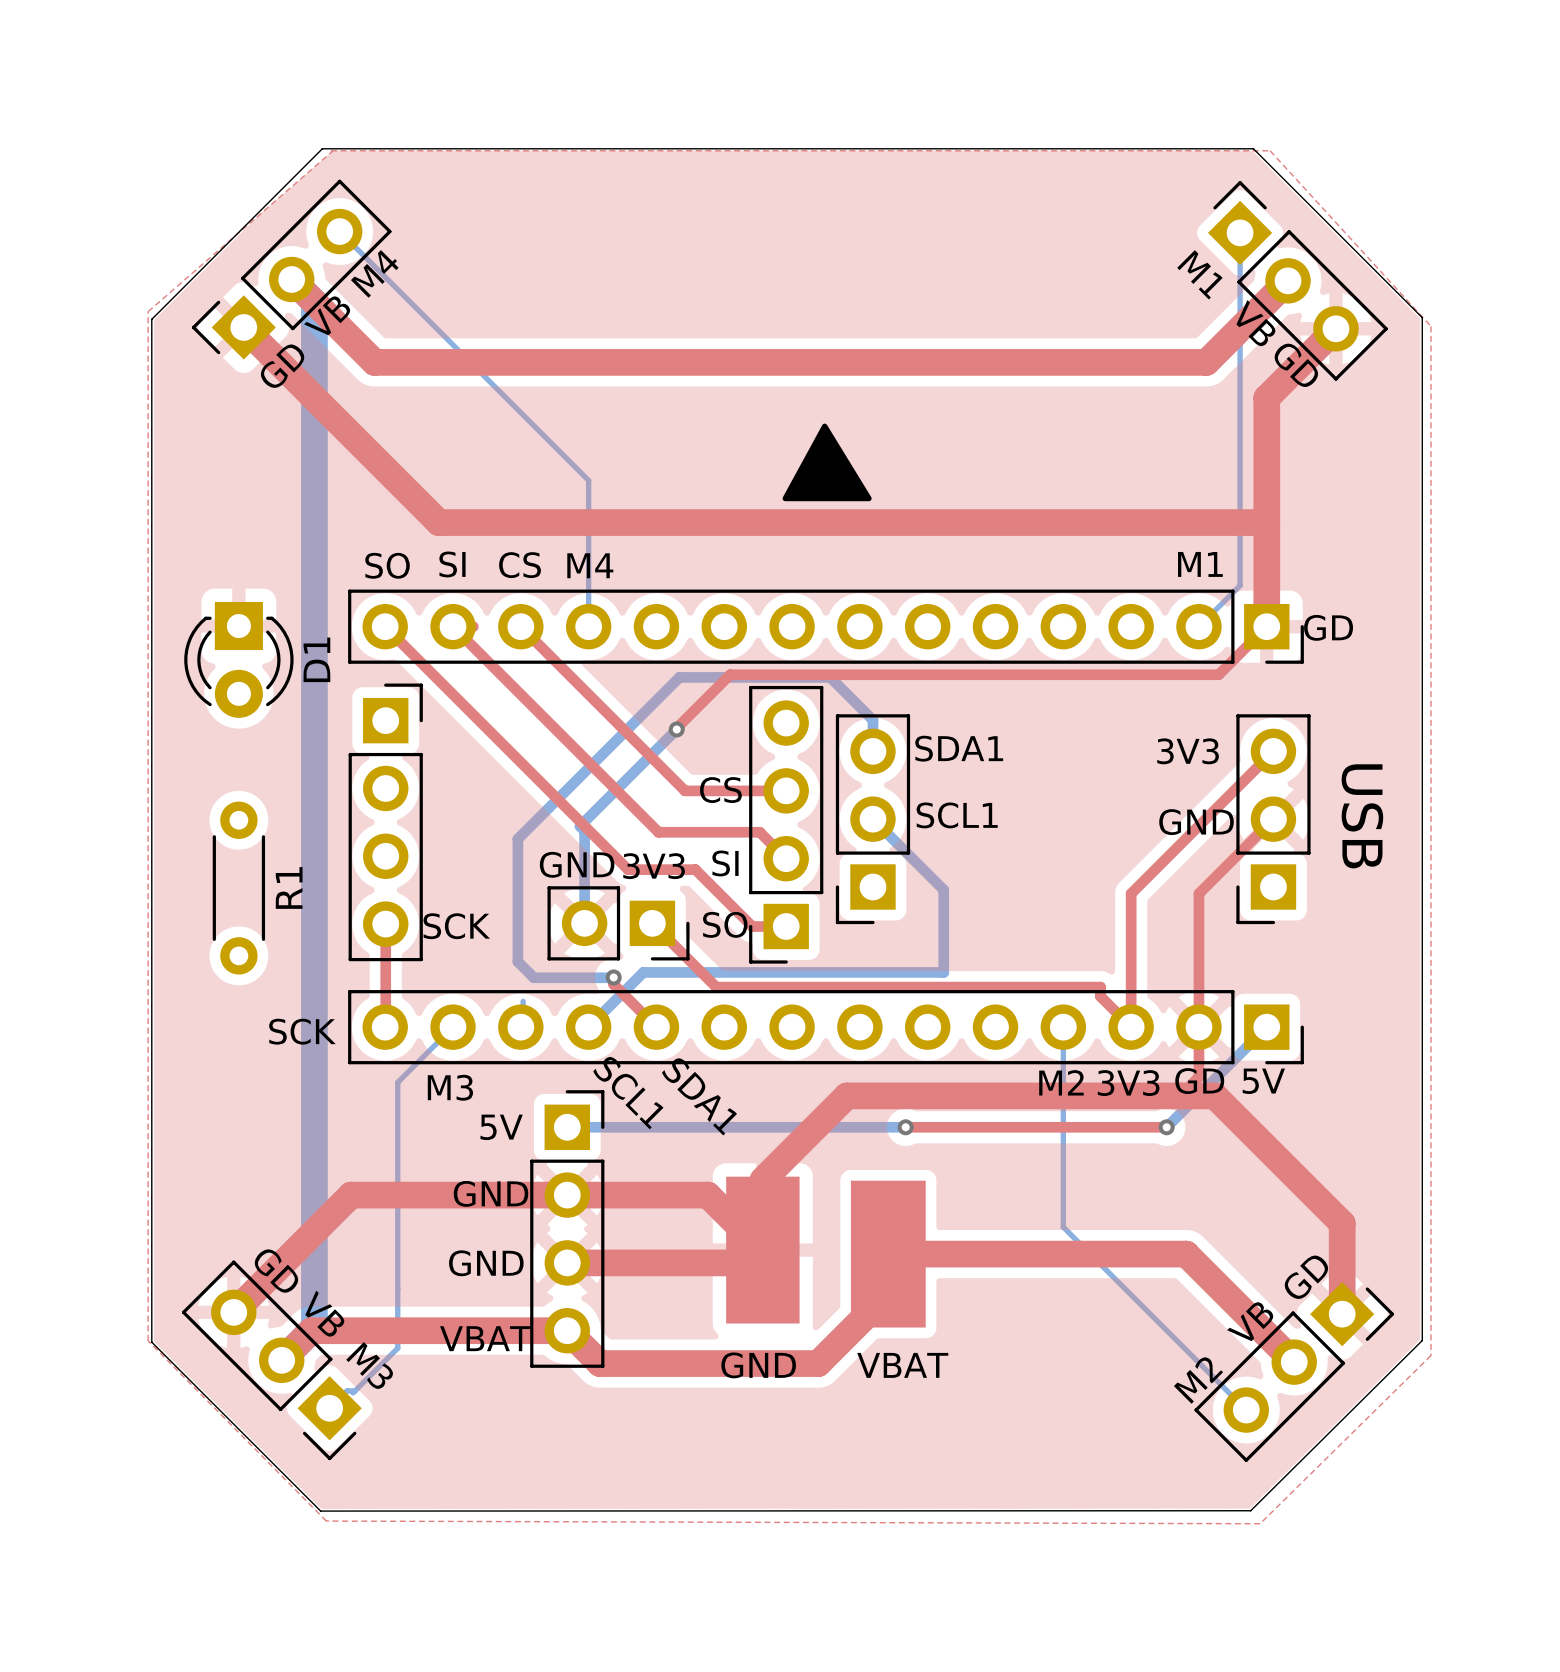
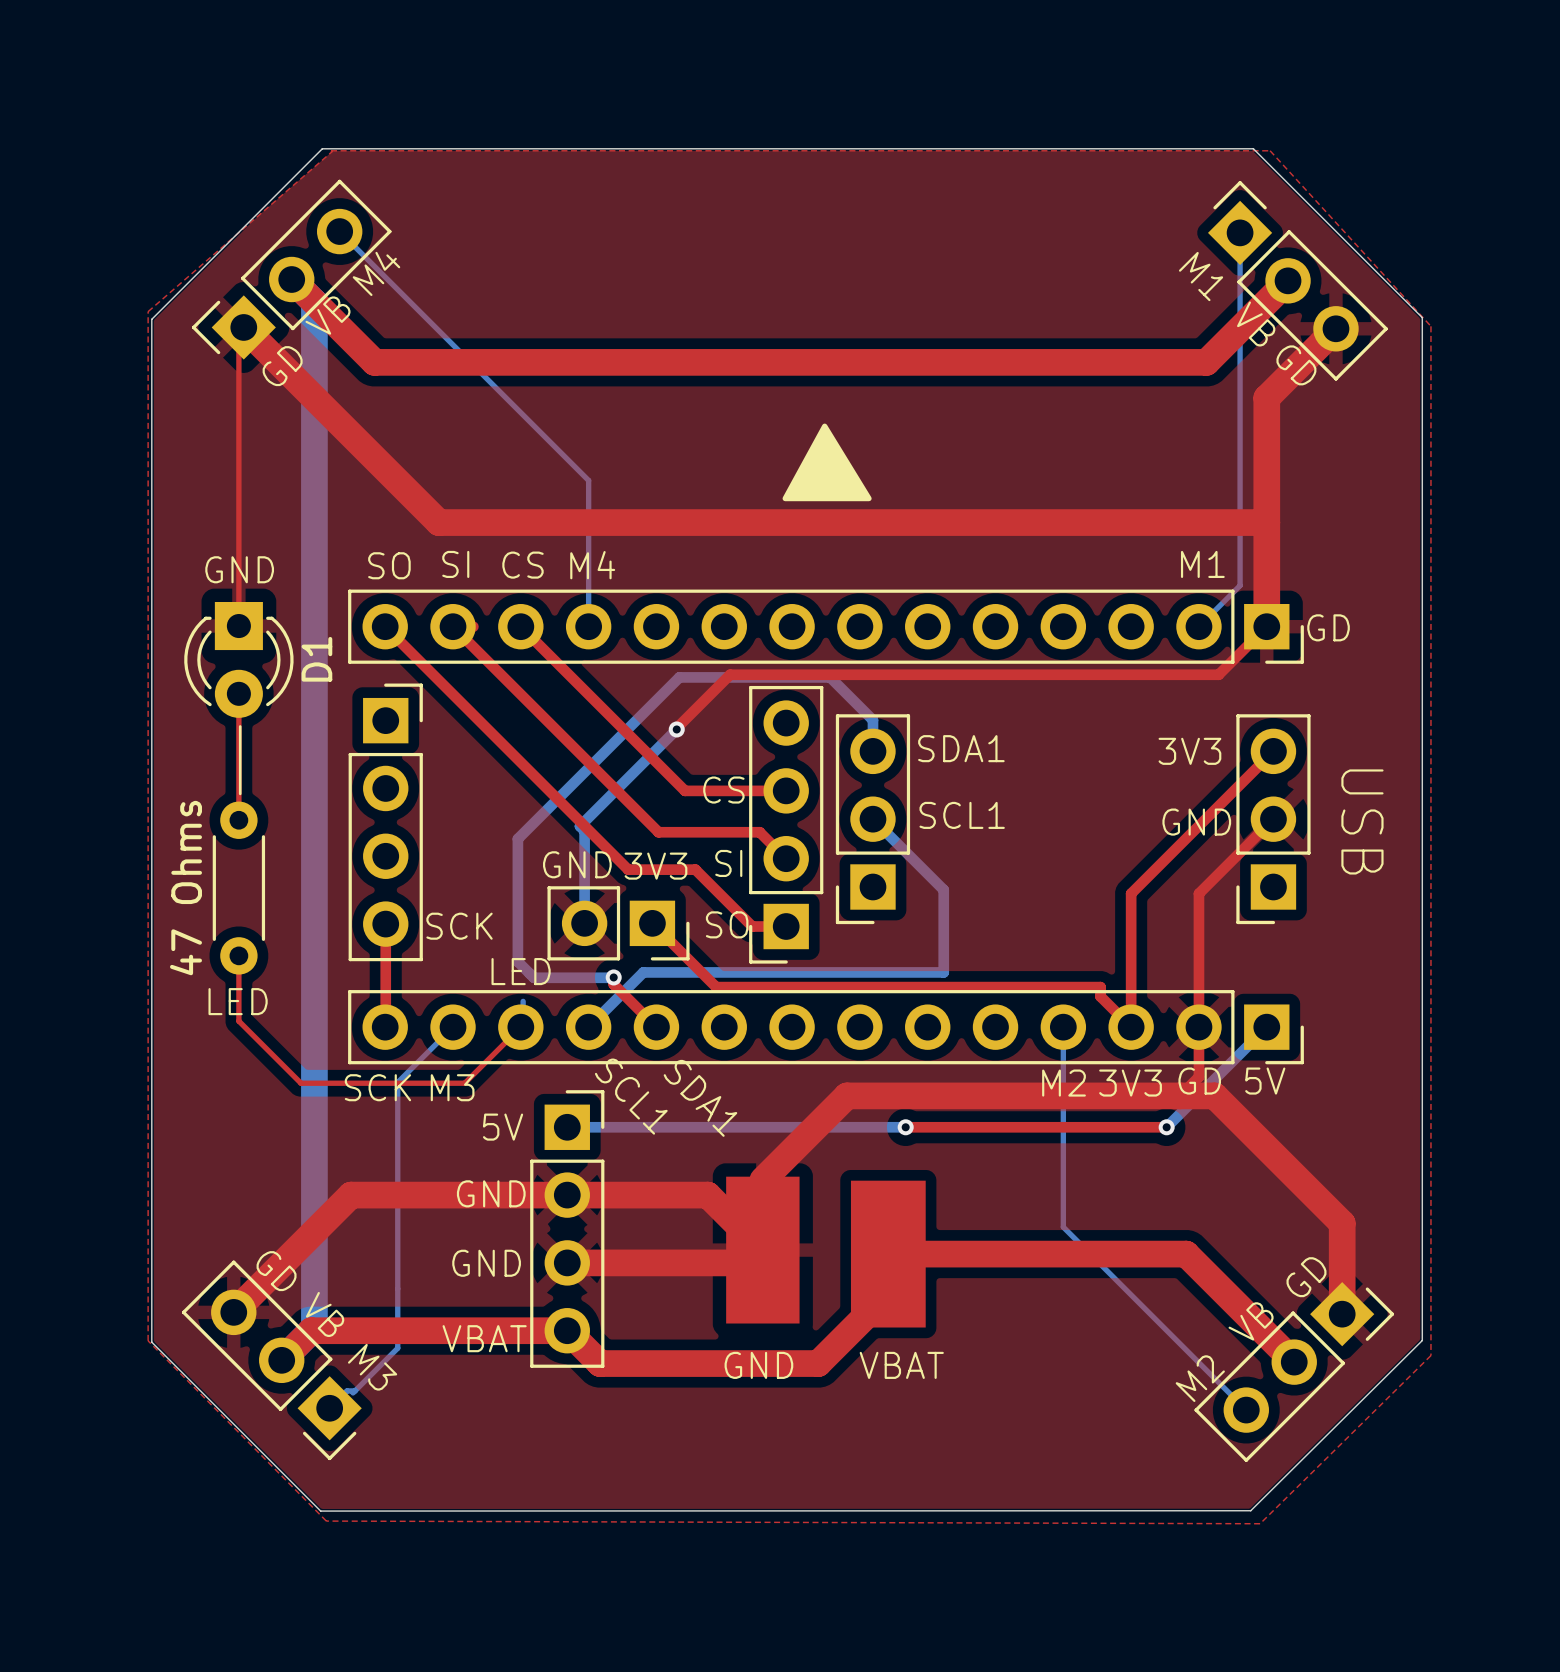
top track: none -> (243, 327) (238, 332) (238, 626)
text: none -> GND (239, 569)
top track: none -> (238, 693) (238, 820)
line: none -> (240, 726) (240, 793)
R1 name: R1 (289, 887) -> none
R1 value: none -> 47 Ohms (186, 888)
top track: none -> (238, 955) (238, 1021) (300, 1083) (464, 1083) (520, 1027)
text: none -> LED (521, 971)
text: none -> LED (238, 1001)
text position: SCK (302, 1031) -> SCK (377, 1087)

